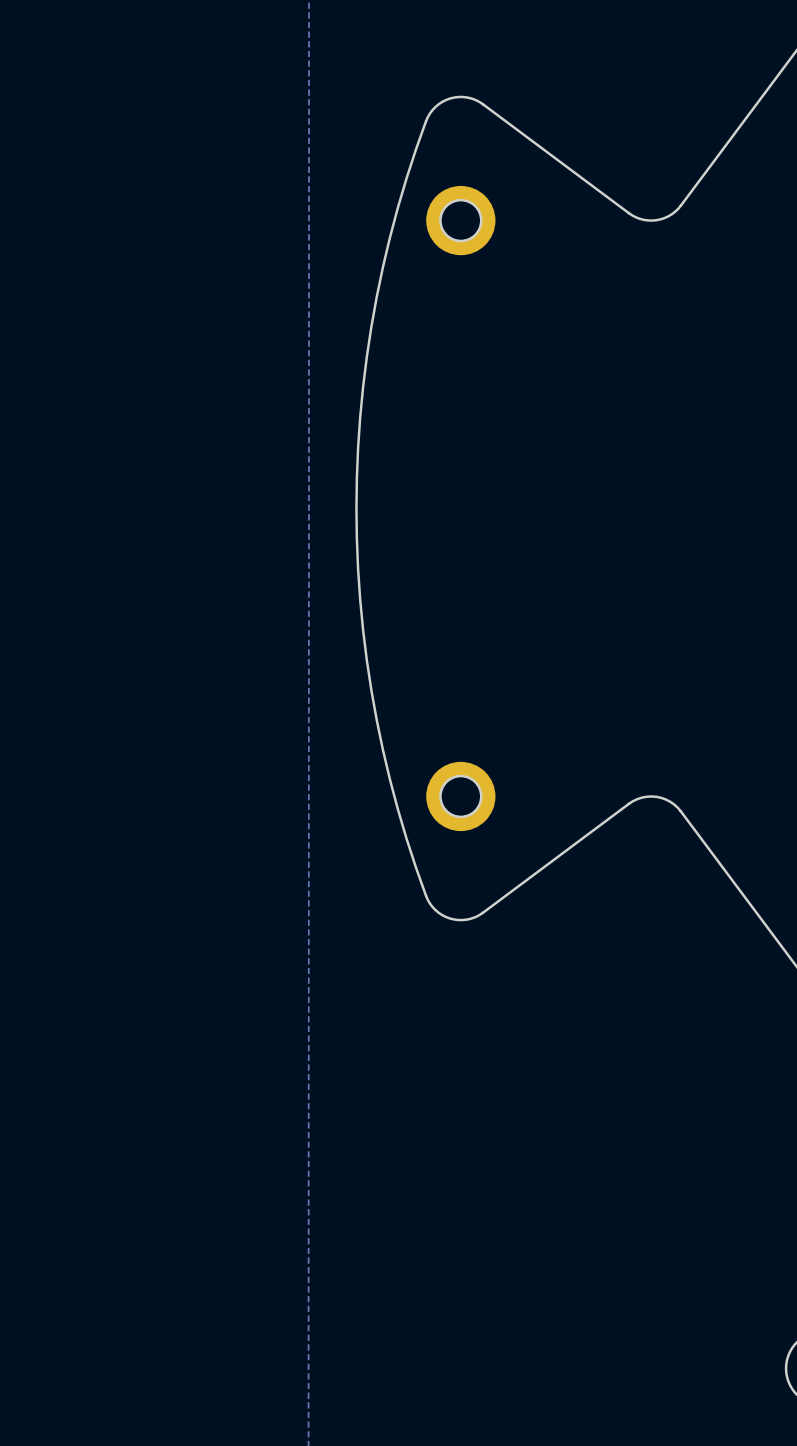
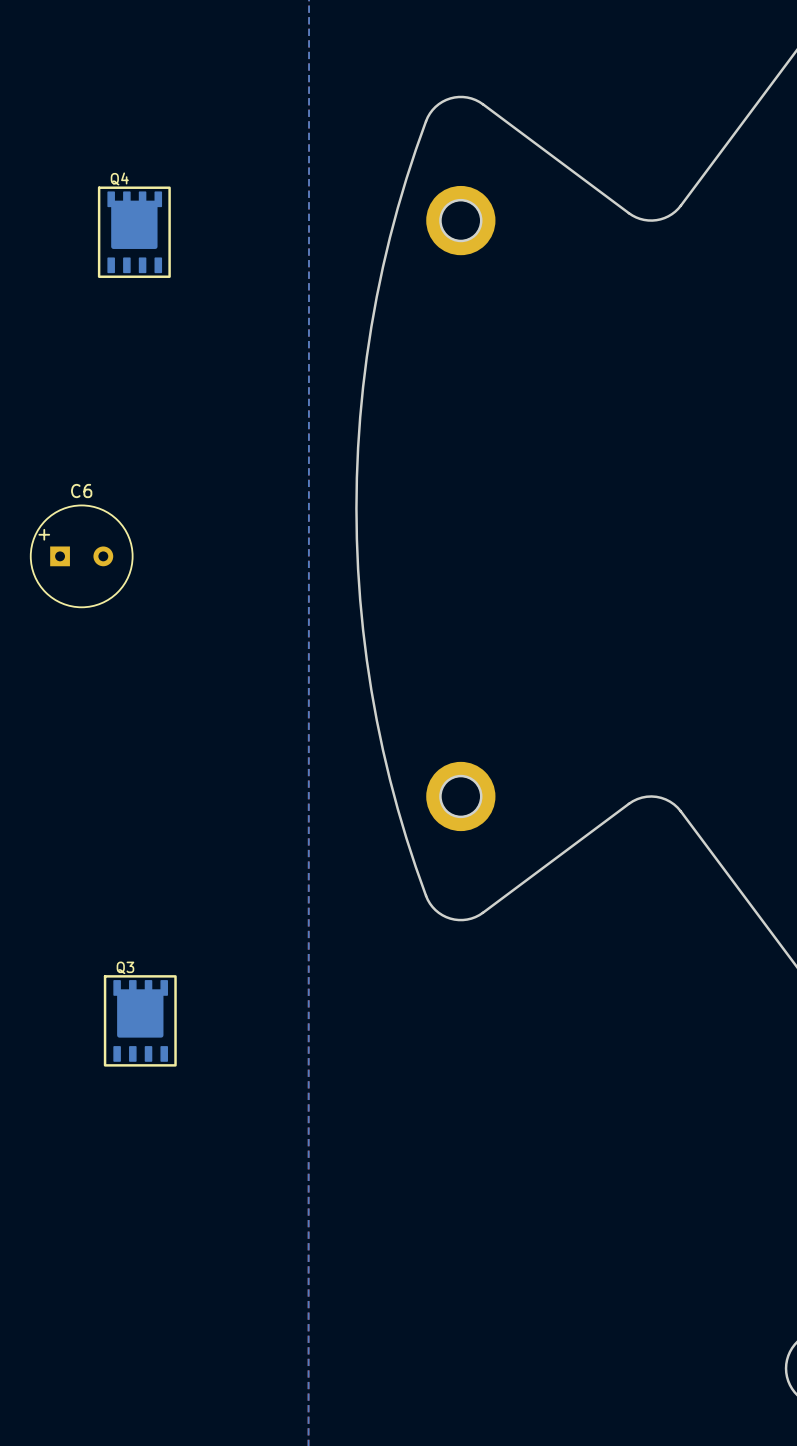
Q4: none -> (134, 232)
C6: none -> (81, 556)
Q3: none -> (140, 1020)

